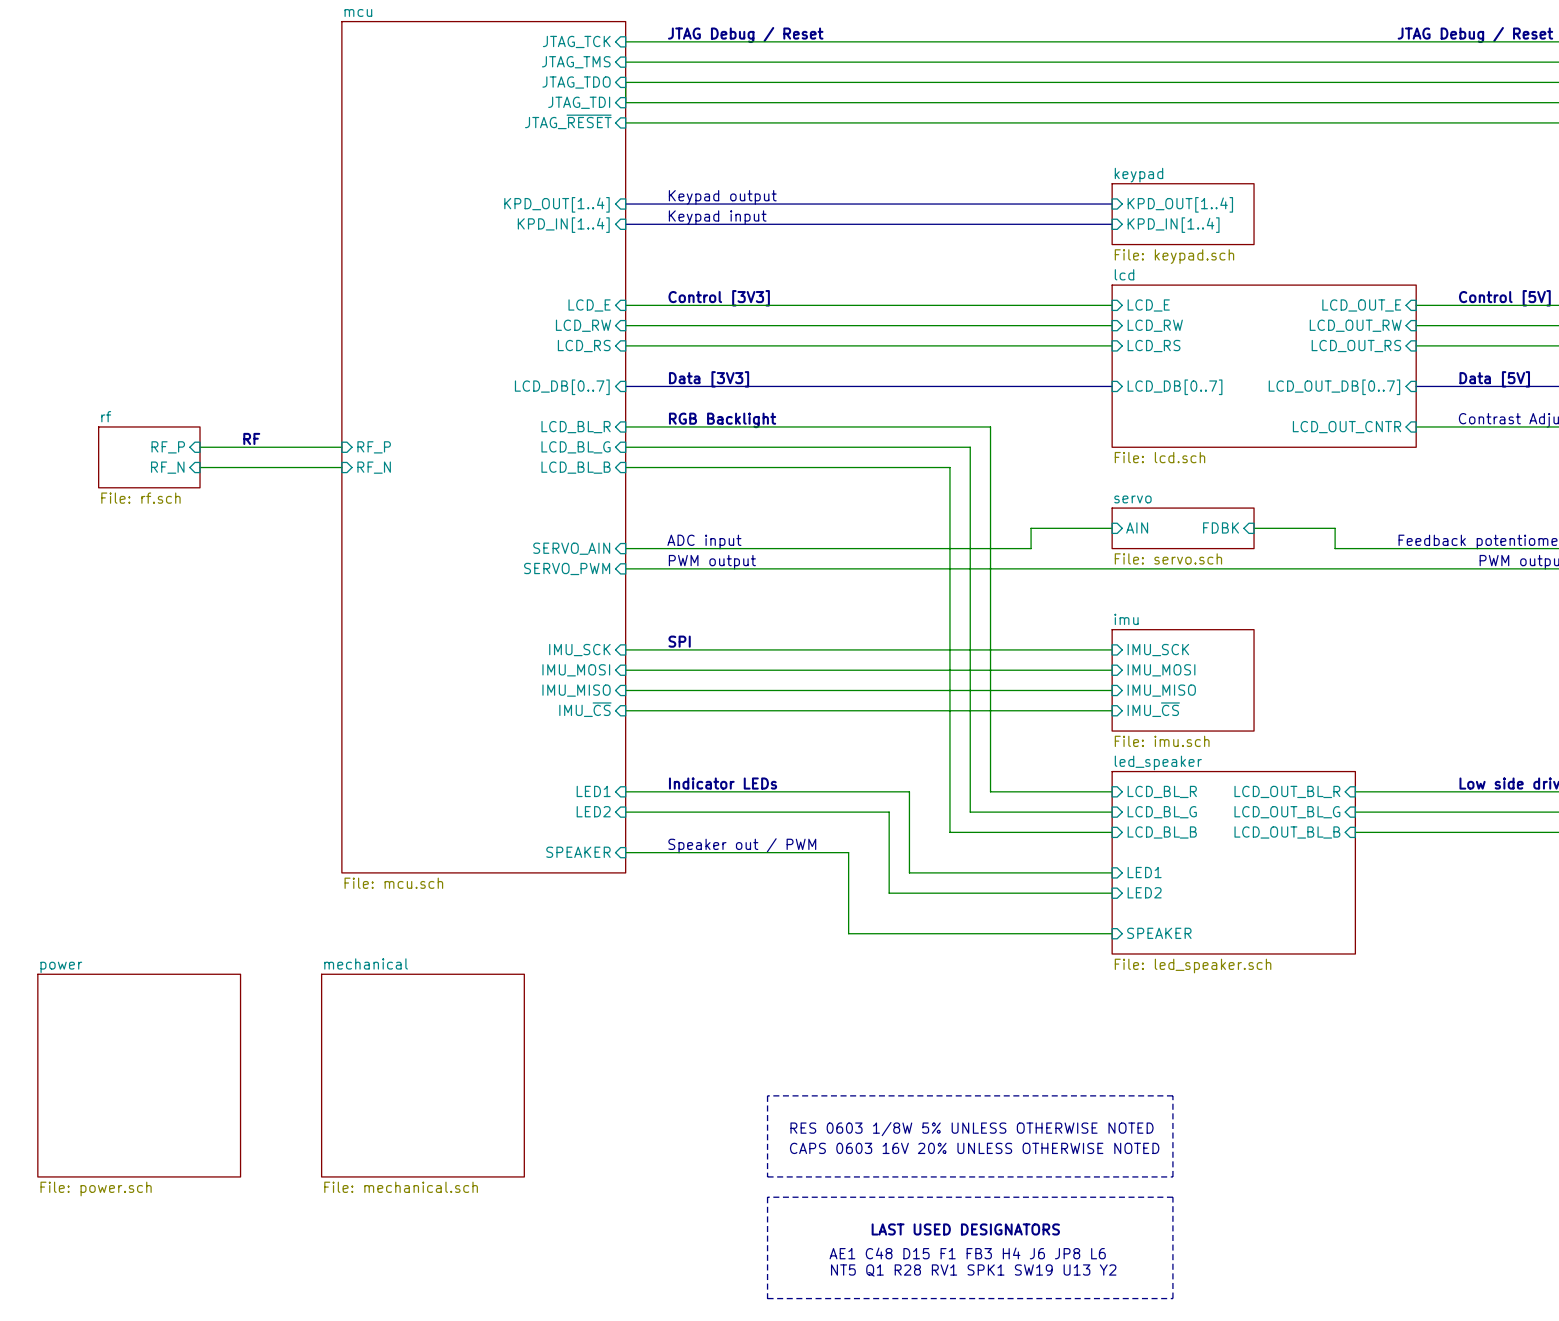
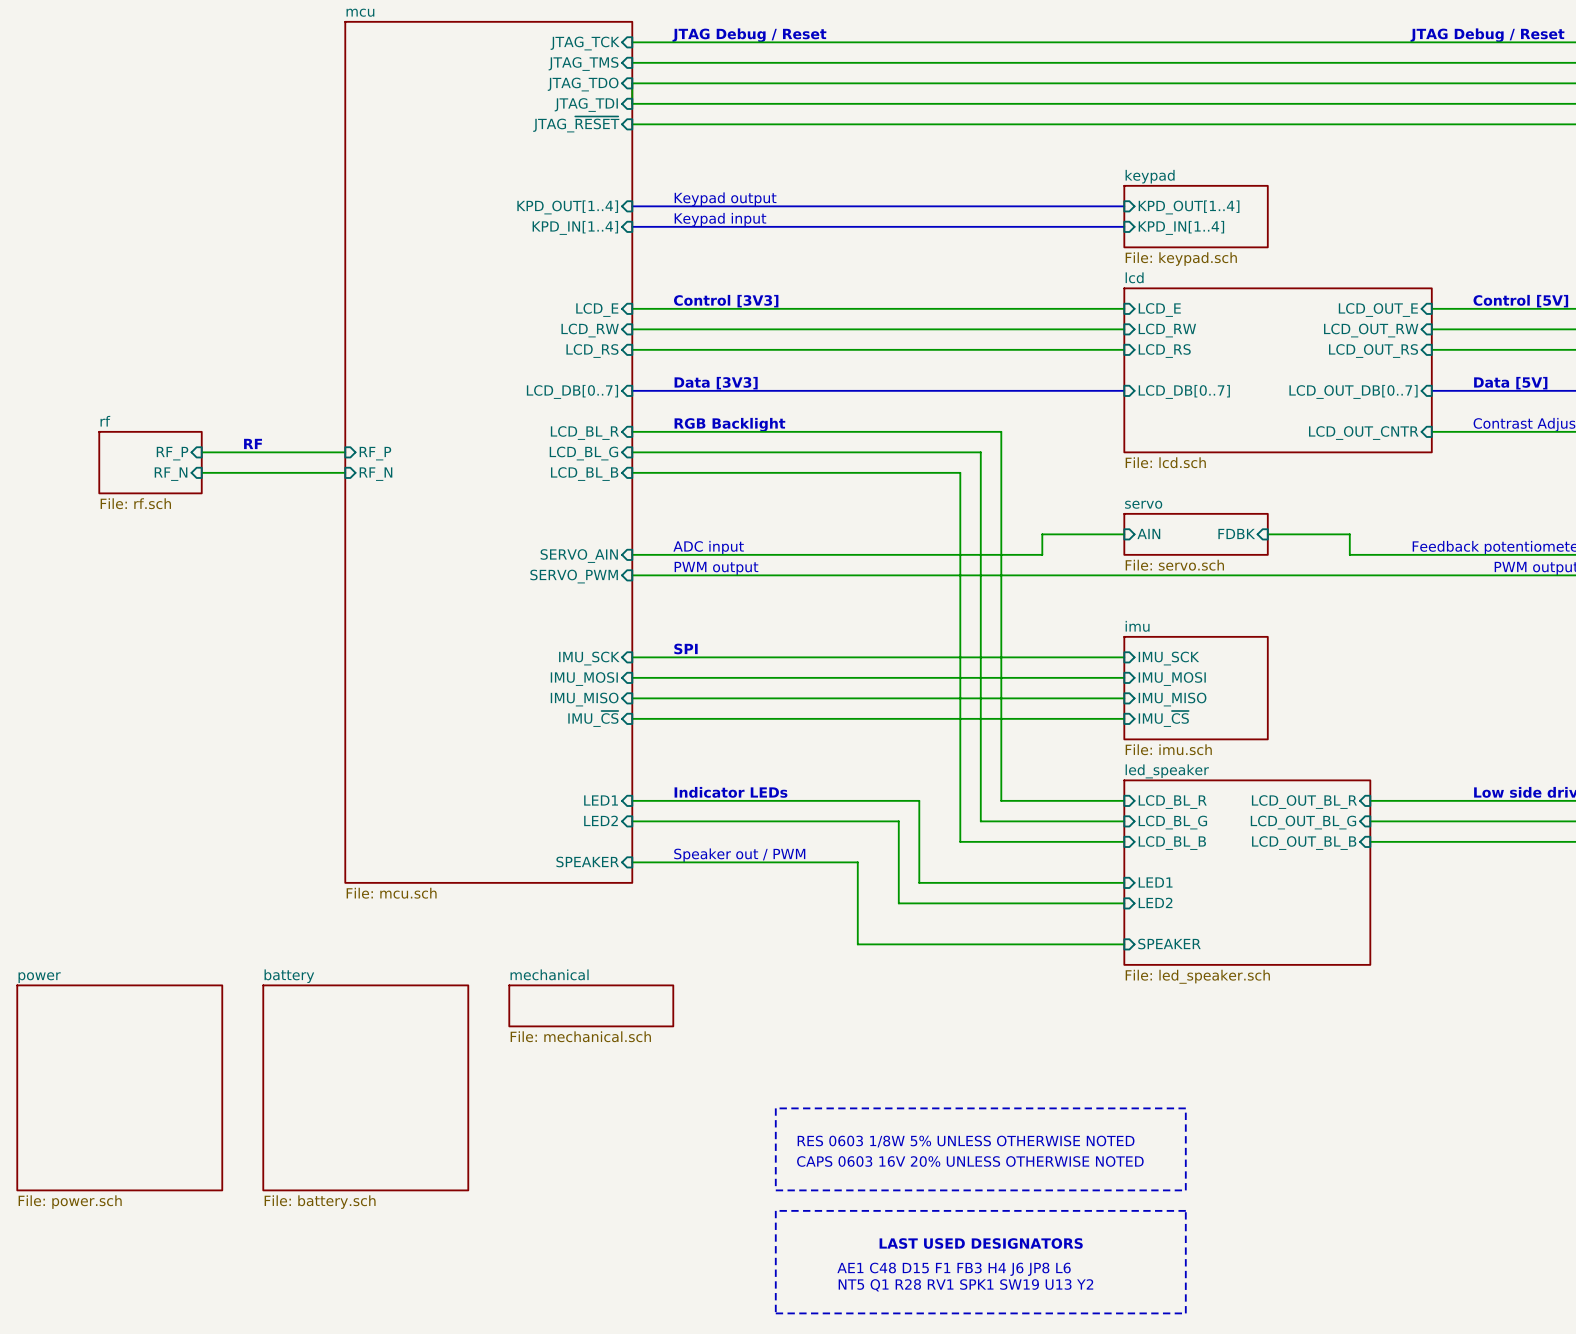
sheet mechanical: none -> File: mechanical.sch (591, 1005)
sheet power position: (139, 1075) -> (119, 1087)
sheet battery: none -> File: battery.sch (365, 1087)
sheet mechanical: File: mechanical.sch (422, 1075) -> none

